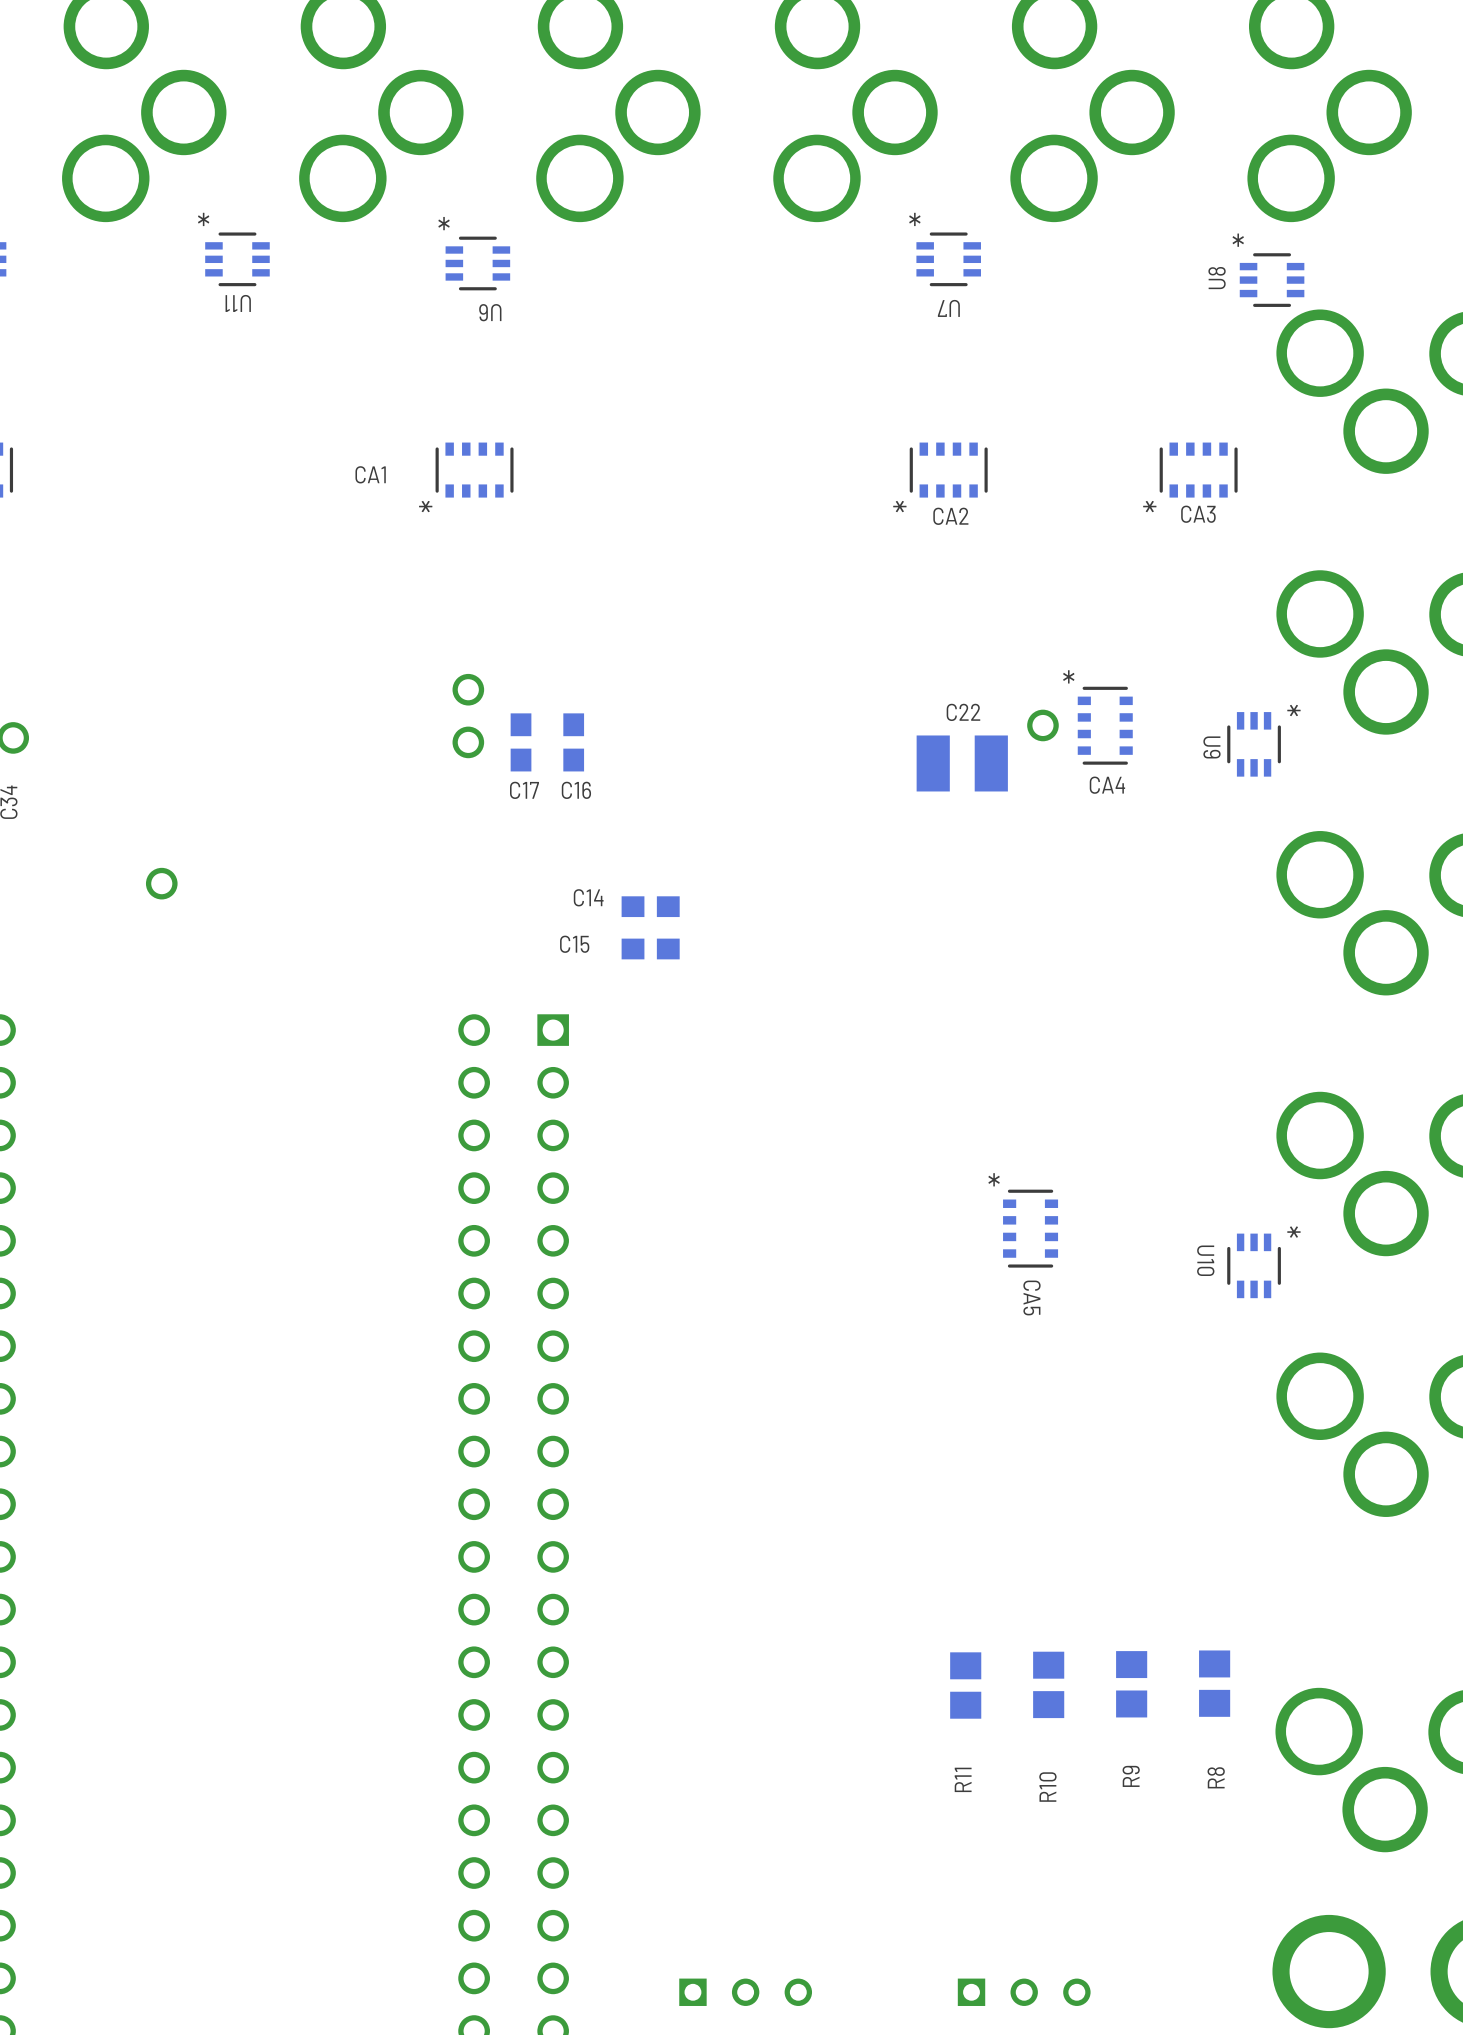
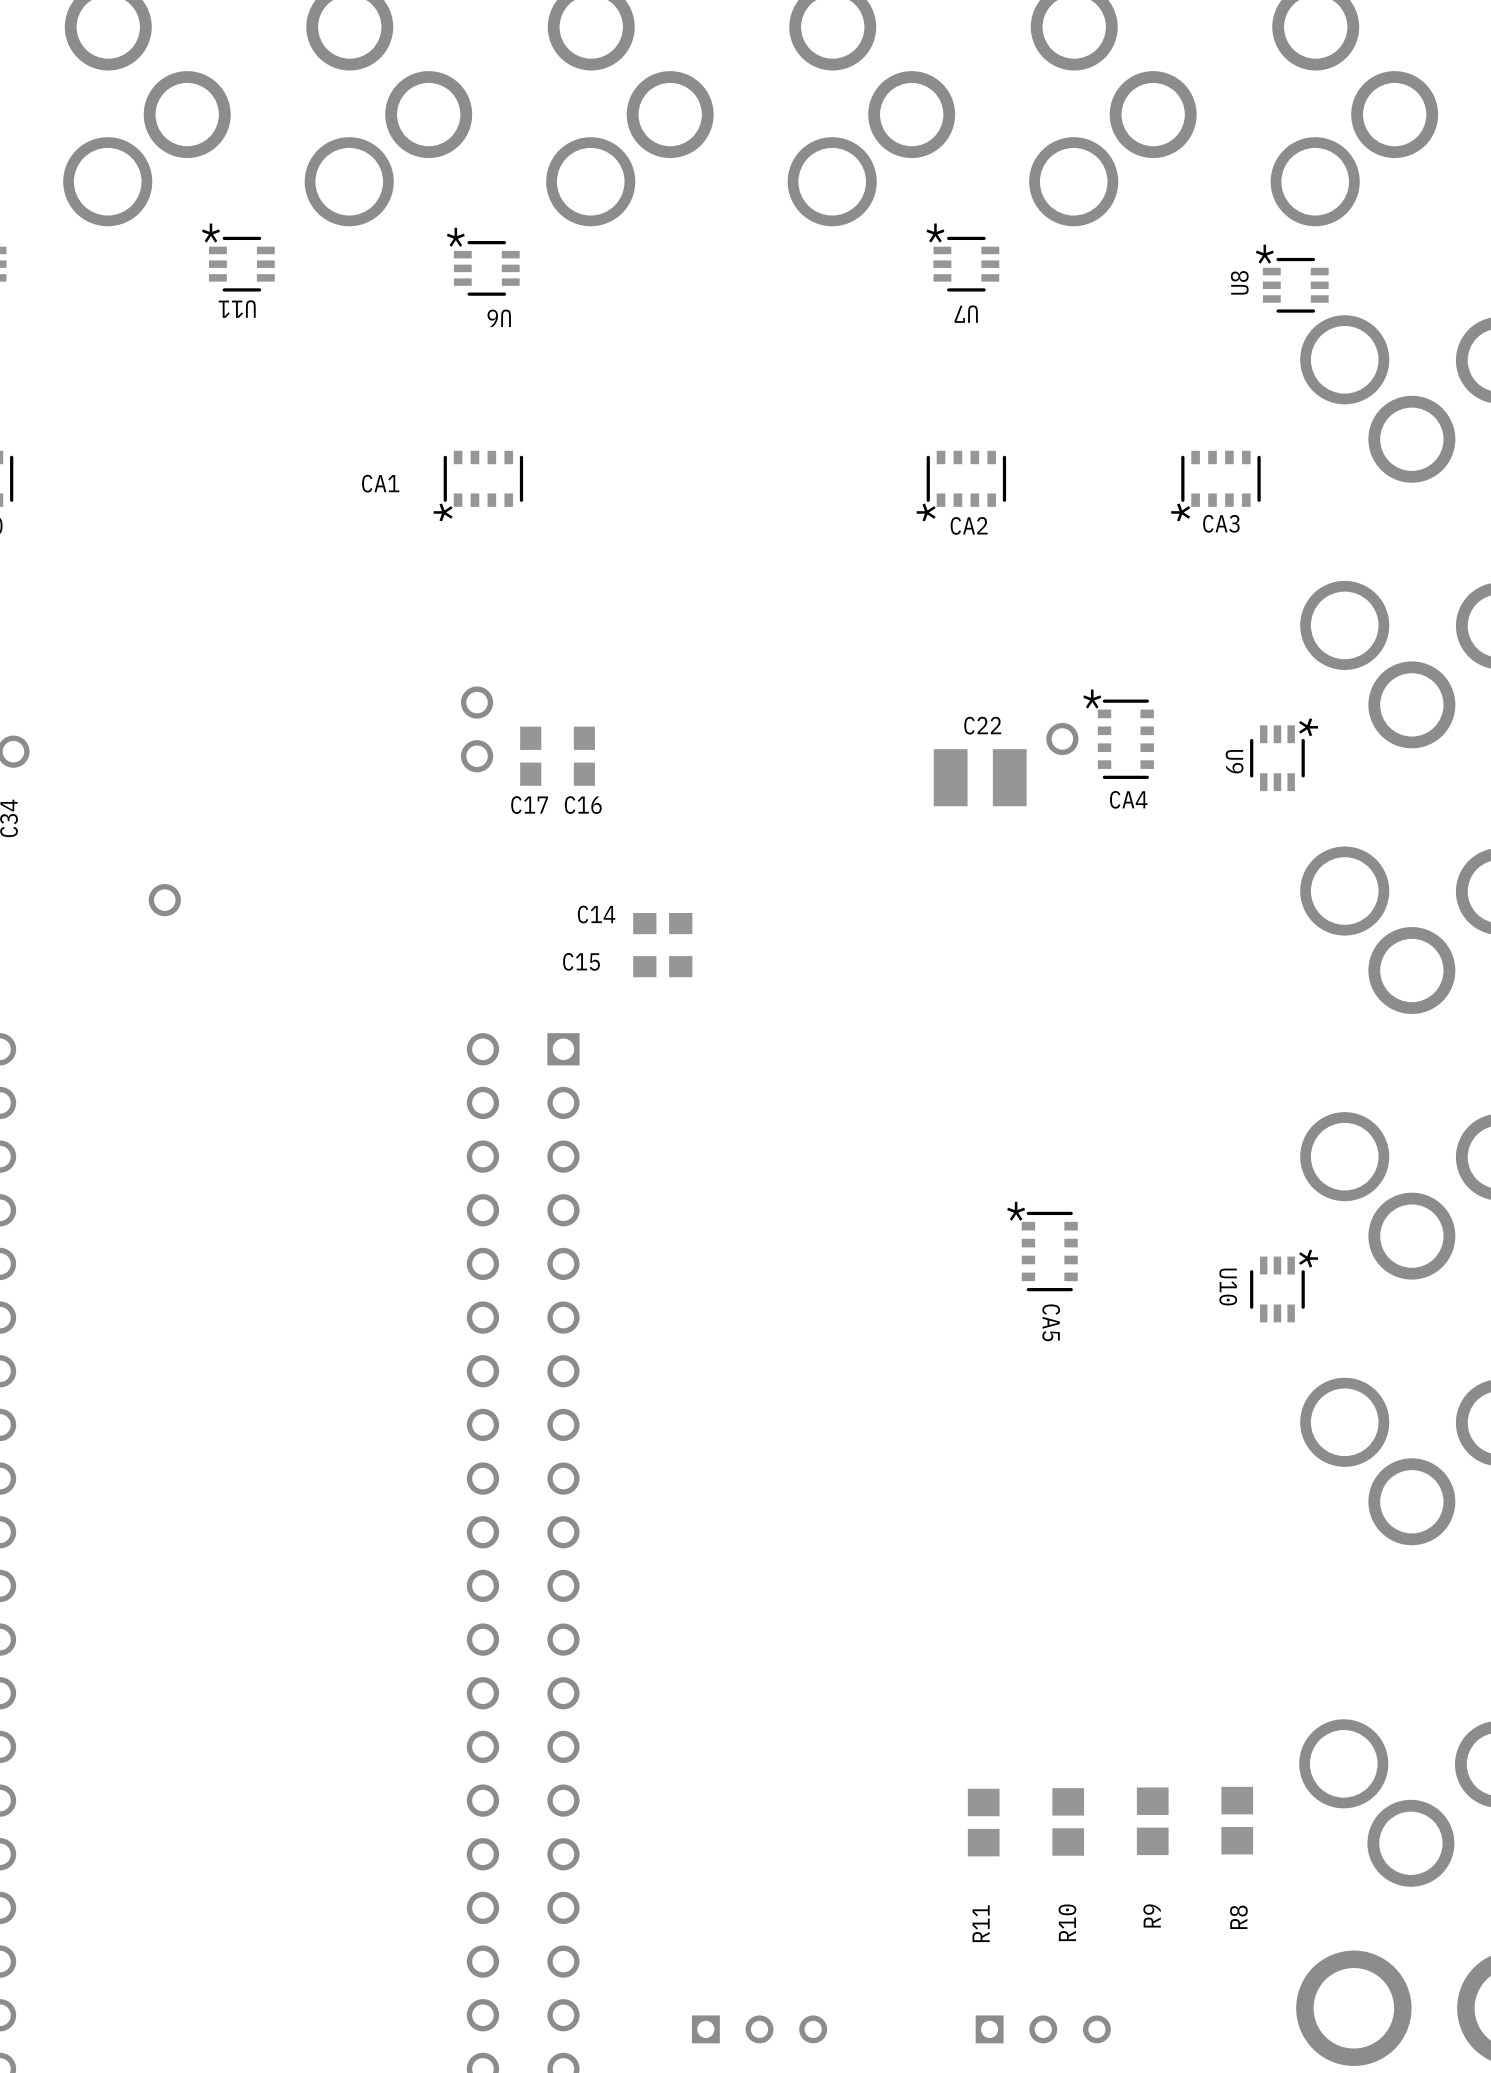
R8 position: (1214, 1683) -> (1237, 1820)
R10 position: (1048, 1684) -> (1068, 1821)
R9 position: (1131, 1684) -> (1152, 1821)
R11 position: (965, 1685) -> (983, 1822)

